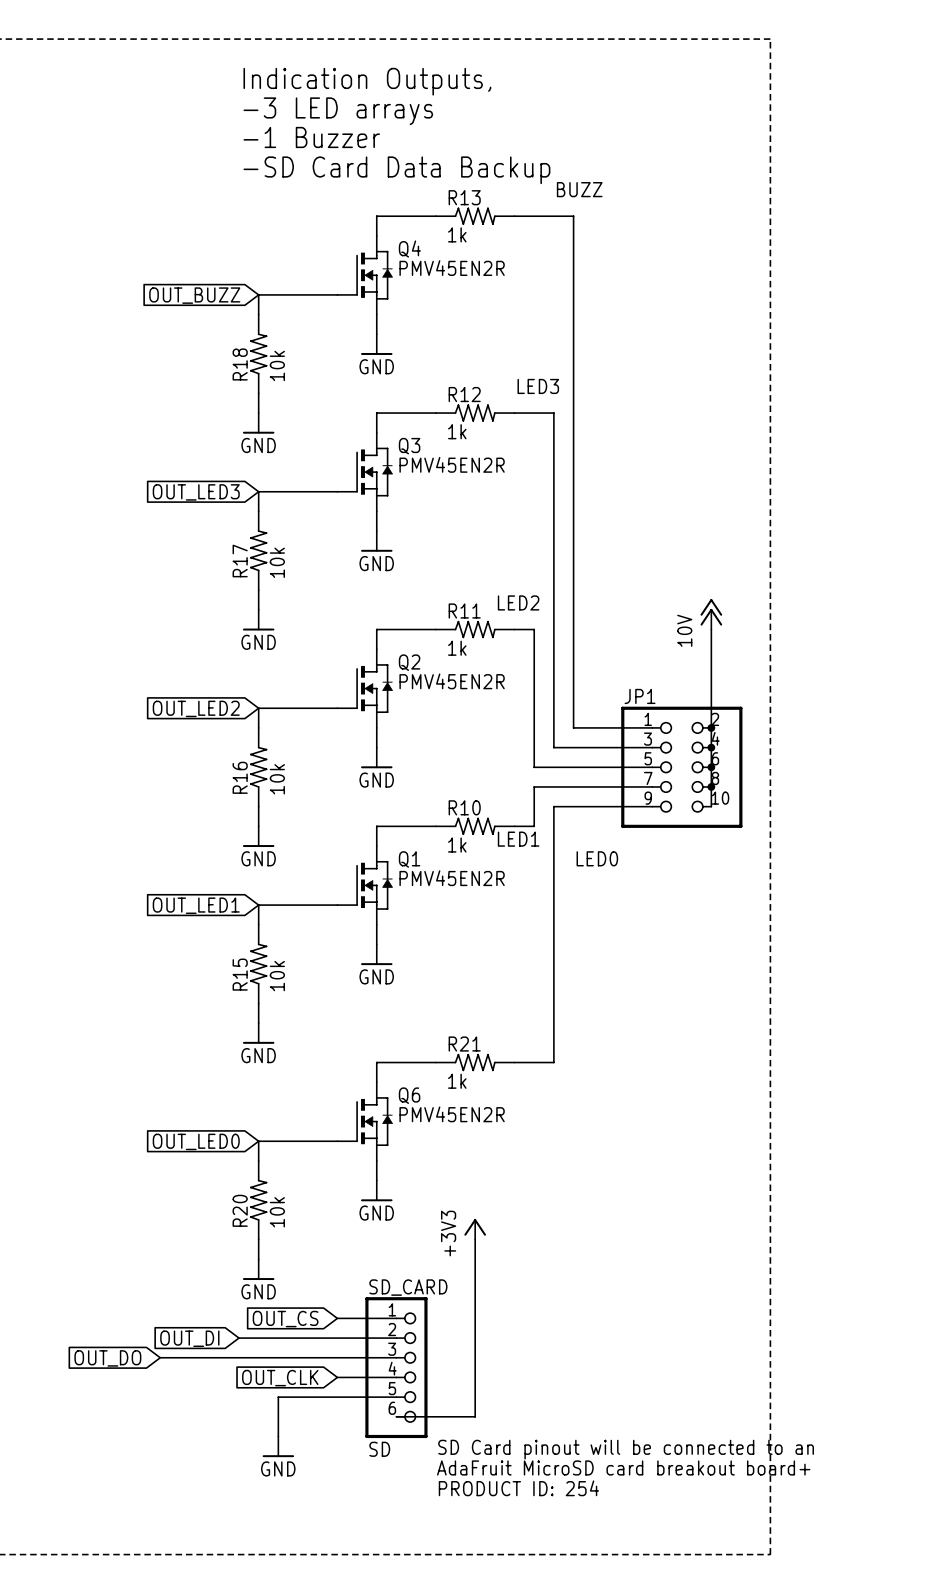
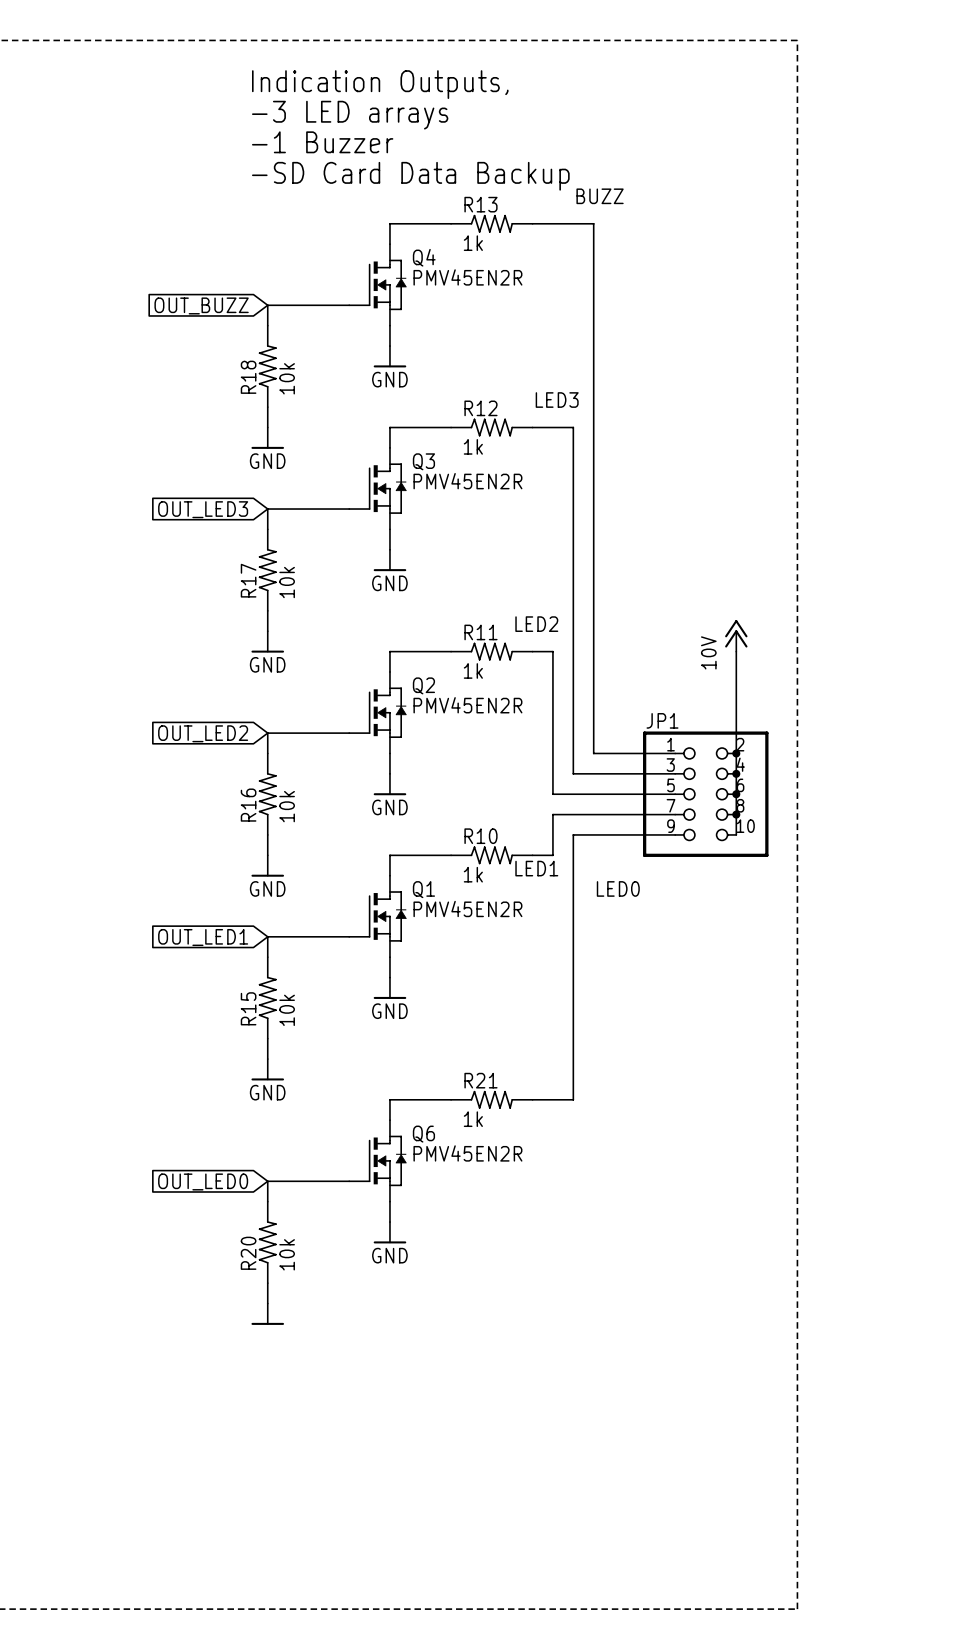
power symbol: +3V3 (475, 1229) -> none
wire: (475, 1239) (475, 1416) (396, 1416) -> none
power symbol text: GND (258, 1291) -> none
wire: (337, 1318) (396, 1318) -> none
global label: OUT_CS (285, 1319) -> none
global label: OUT_DI (189, 1338) -> none
wire: (238, 1338) (396, 1338) -> none
wire: (160, 1357) (396, 1357) -> none
global label: OUT_DO (107, 1358) -> none
SD_CARD: SD (396, 1367) -> none
wire: (337, 1377) (396, 1377) -> none
global label: OUT_CLK (280, 1378) -> none
wire: (396, 1397) (278, 1397) (278, 1436) -> none
power symbol: GND (278, 1446) -> none
text: SD Card pinout will be connected to an (626, 1449) -> none
text: AdaFruit MicroSD card breakout board+ (623, 1467) -> none
text: PRODUCT ID: 254 (518, 1488) -> none

